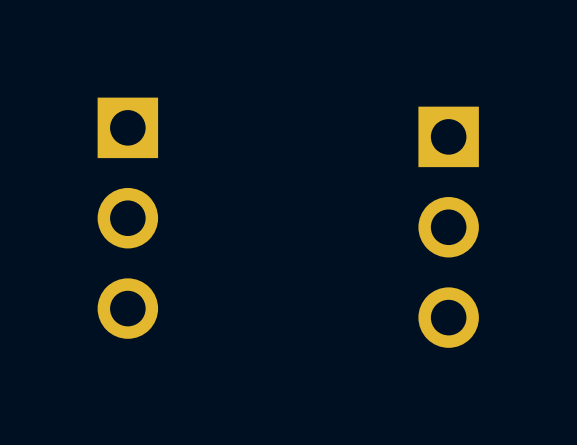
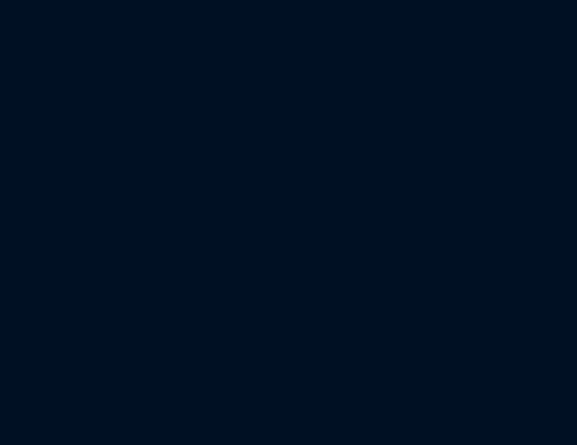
part: (127, 218) -> none
part: (448, 227) -> none

